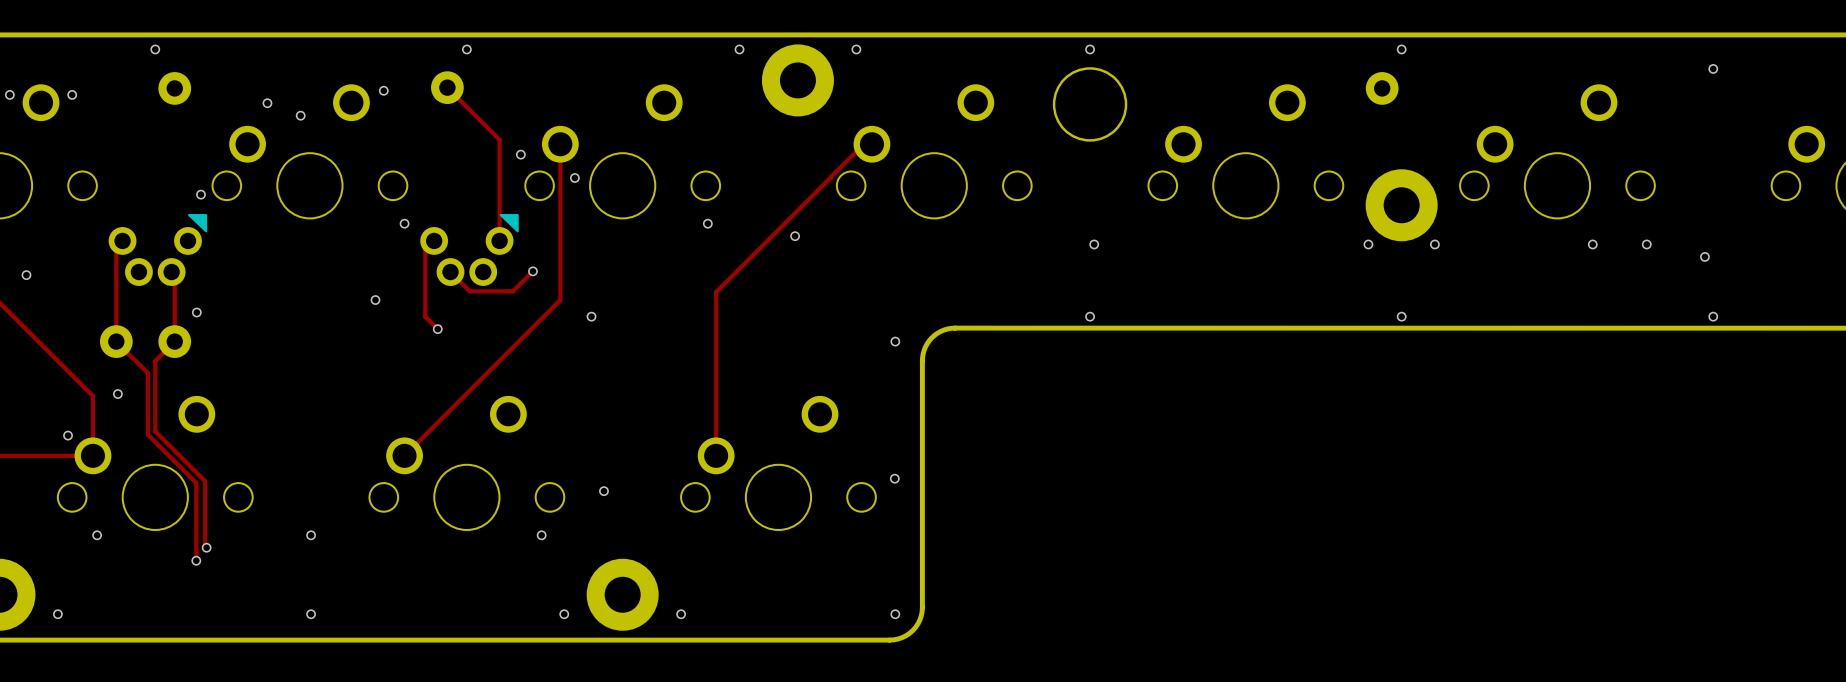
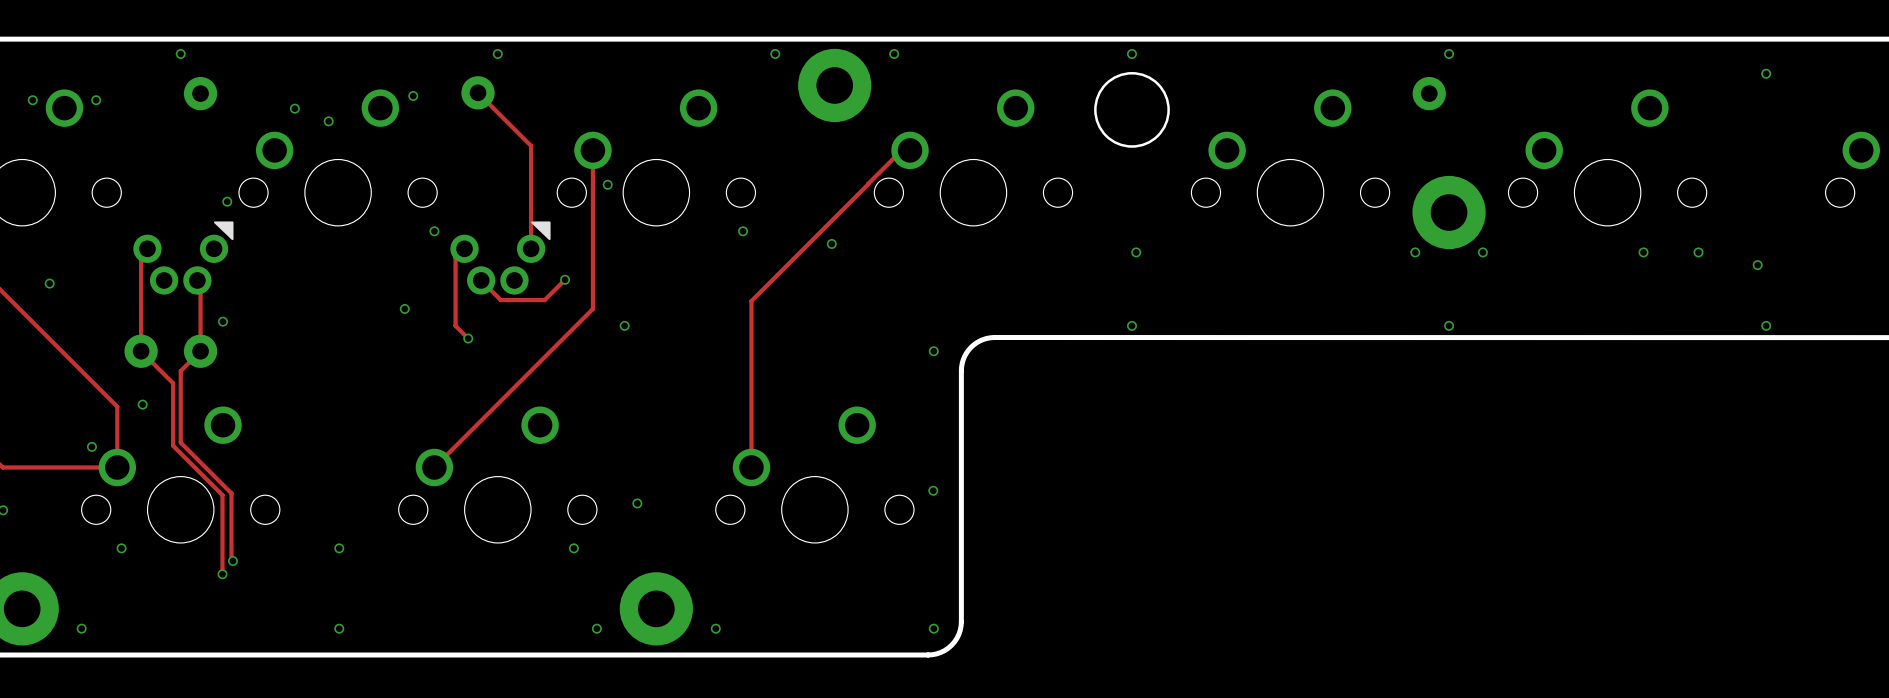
via: (520, 154) -> none

